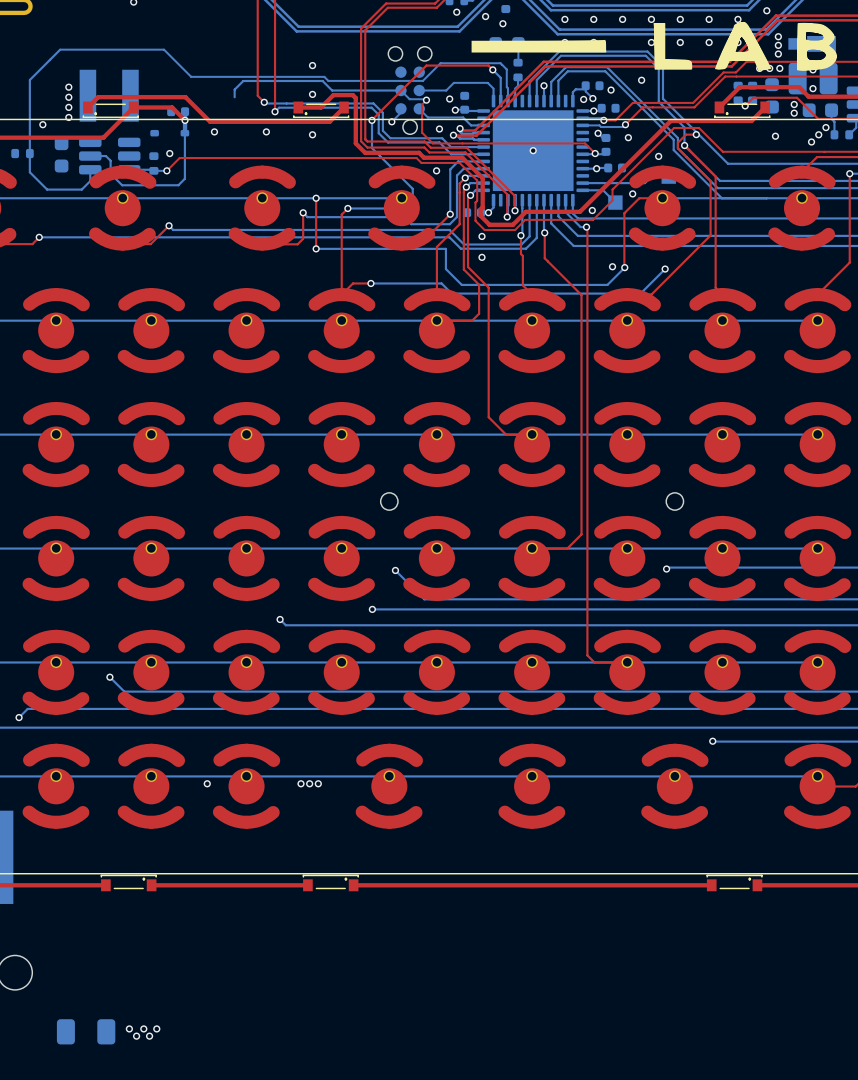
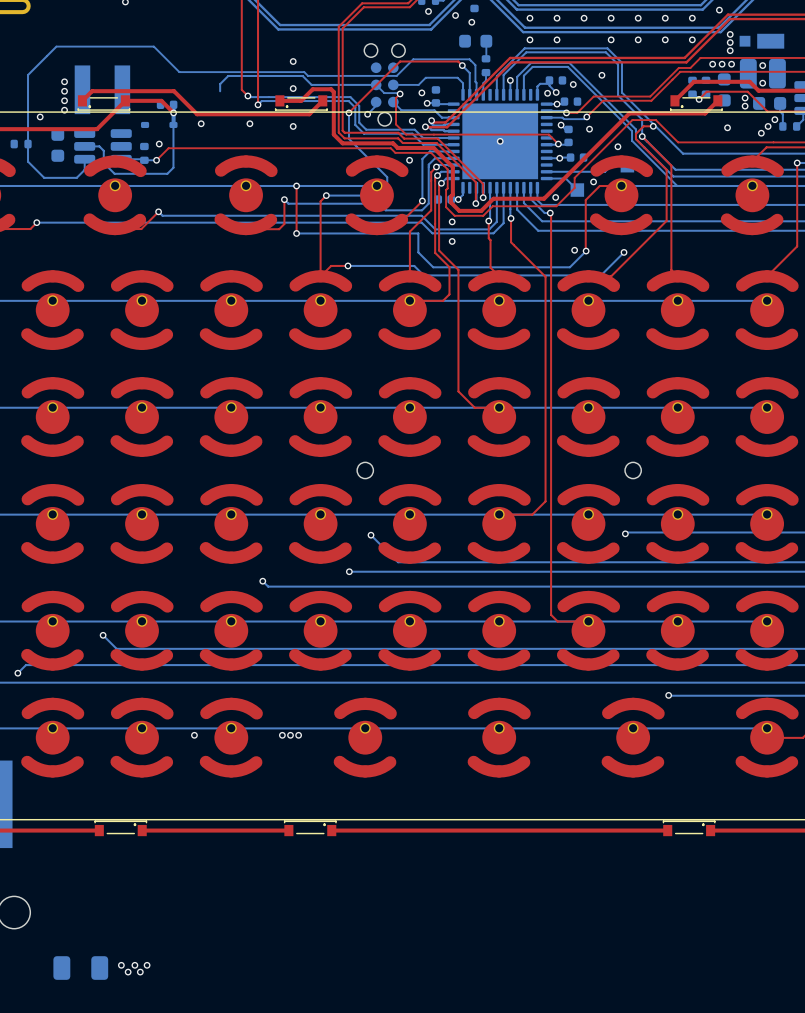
drawing: [715, 21, 772, 71] -> none
drawing: [796, 22, 837, 71] -> none
drawing: [653, 23, 693, 70] -> none
drawing: [471, 39, 607, 53] -> none

